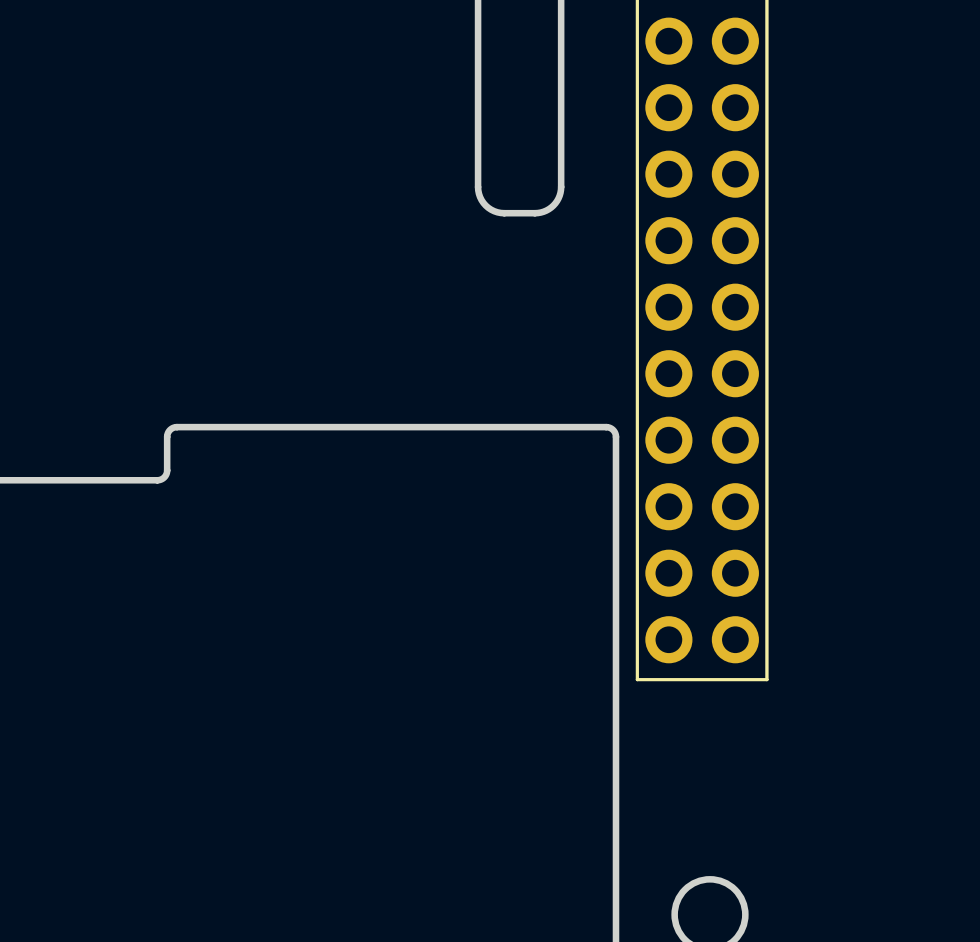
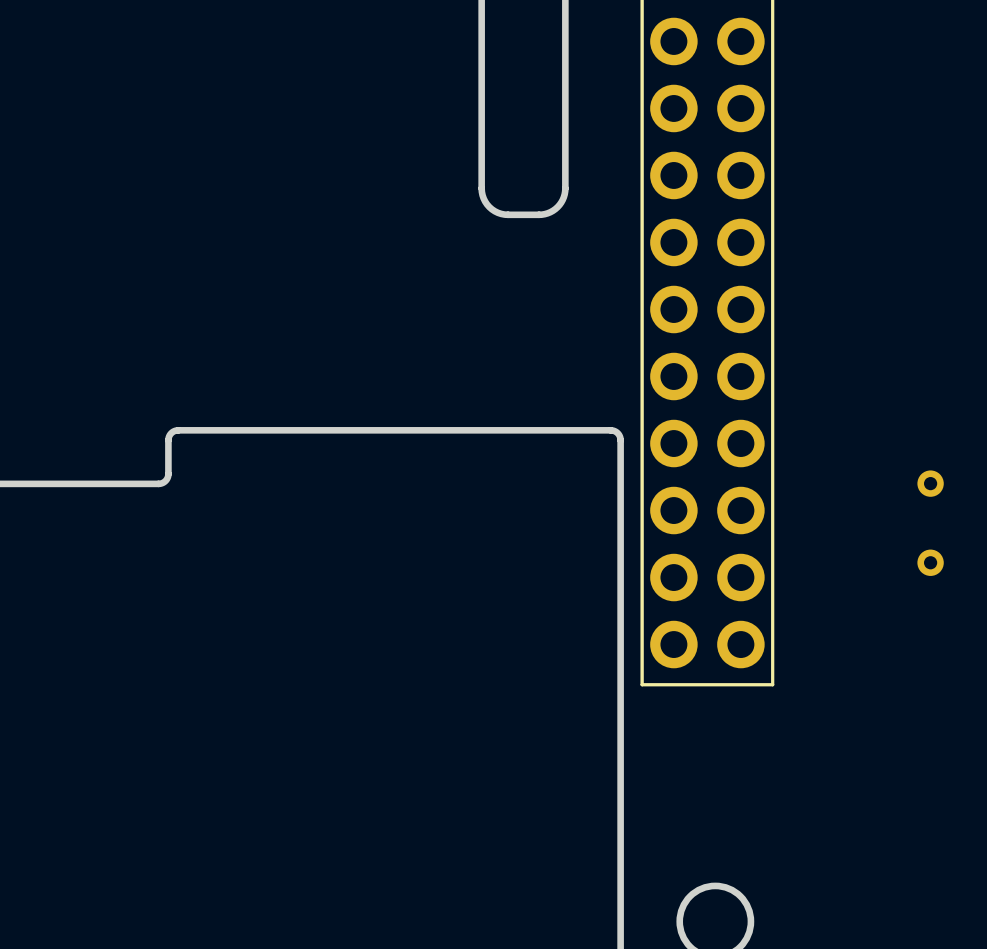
part: none -> (930, 483)
part: none -> (930, 562)

